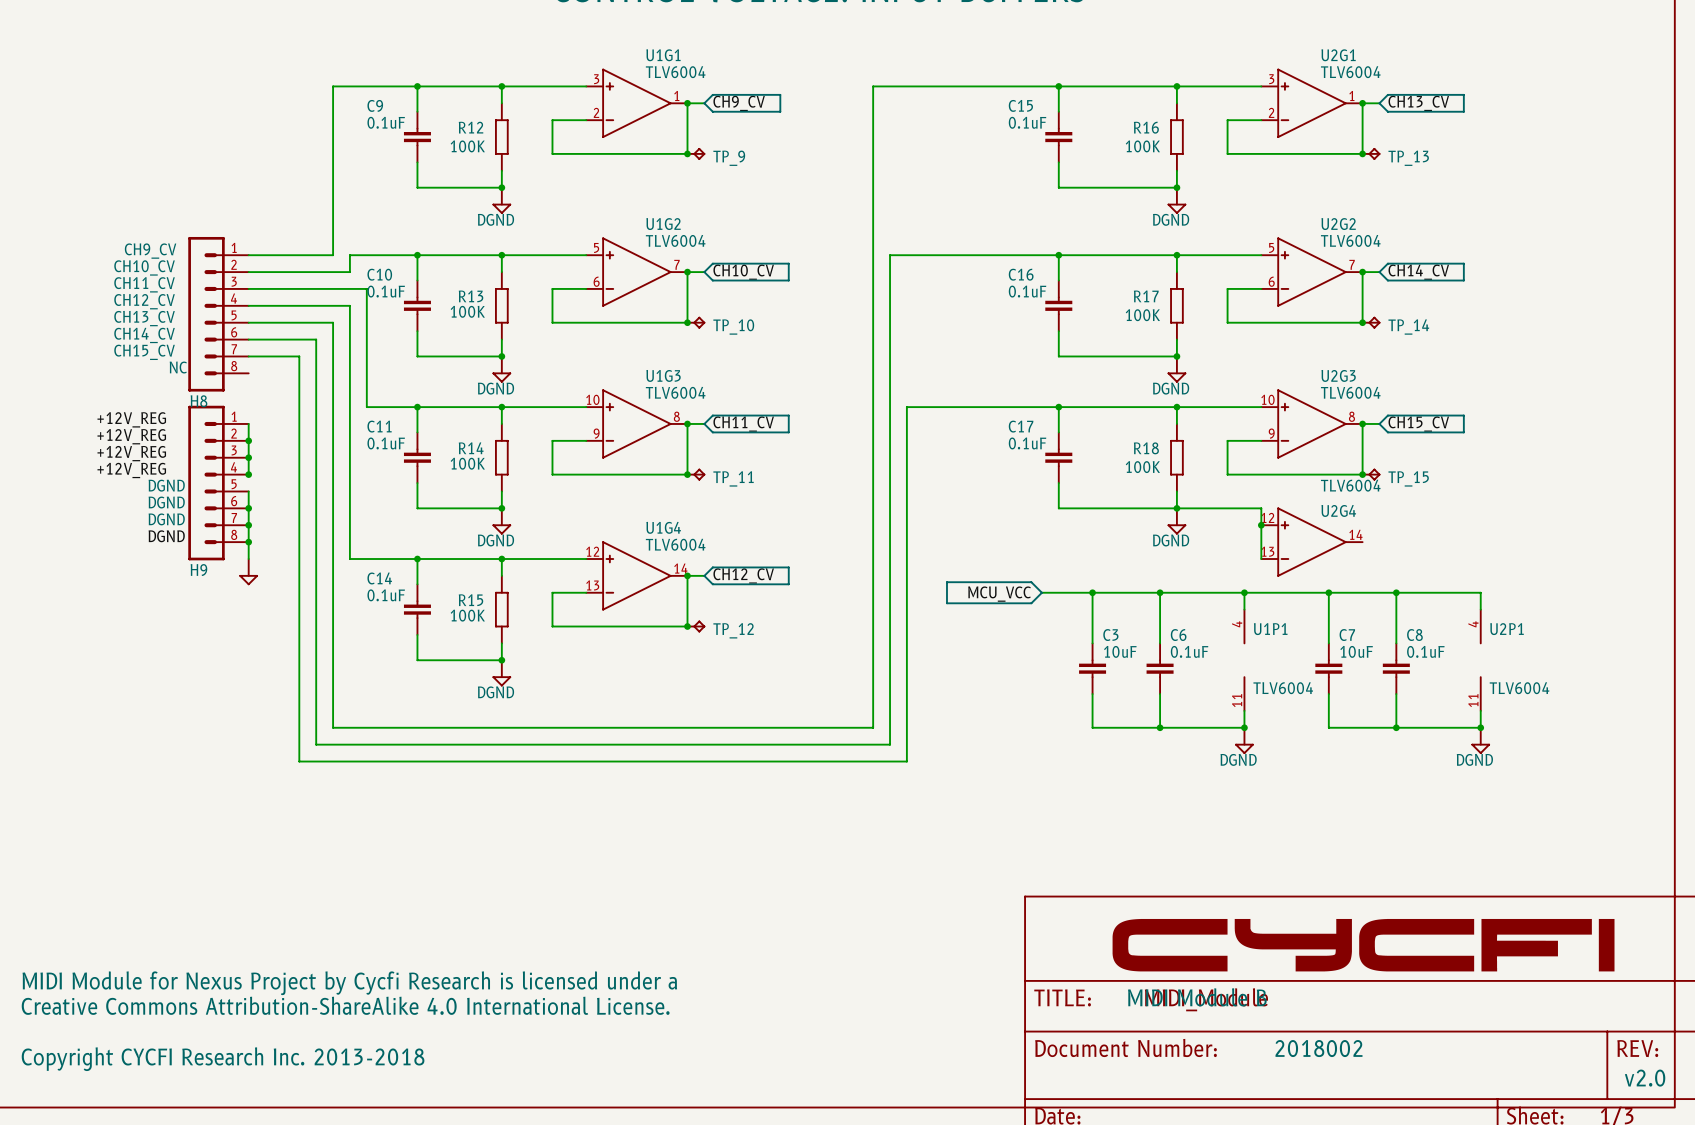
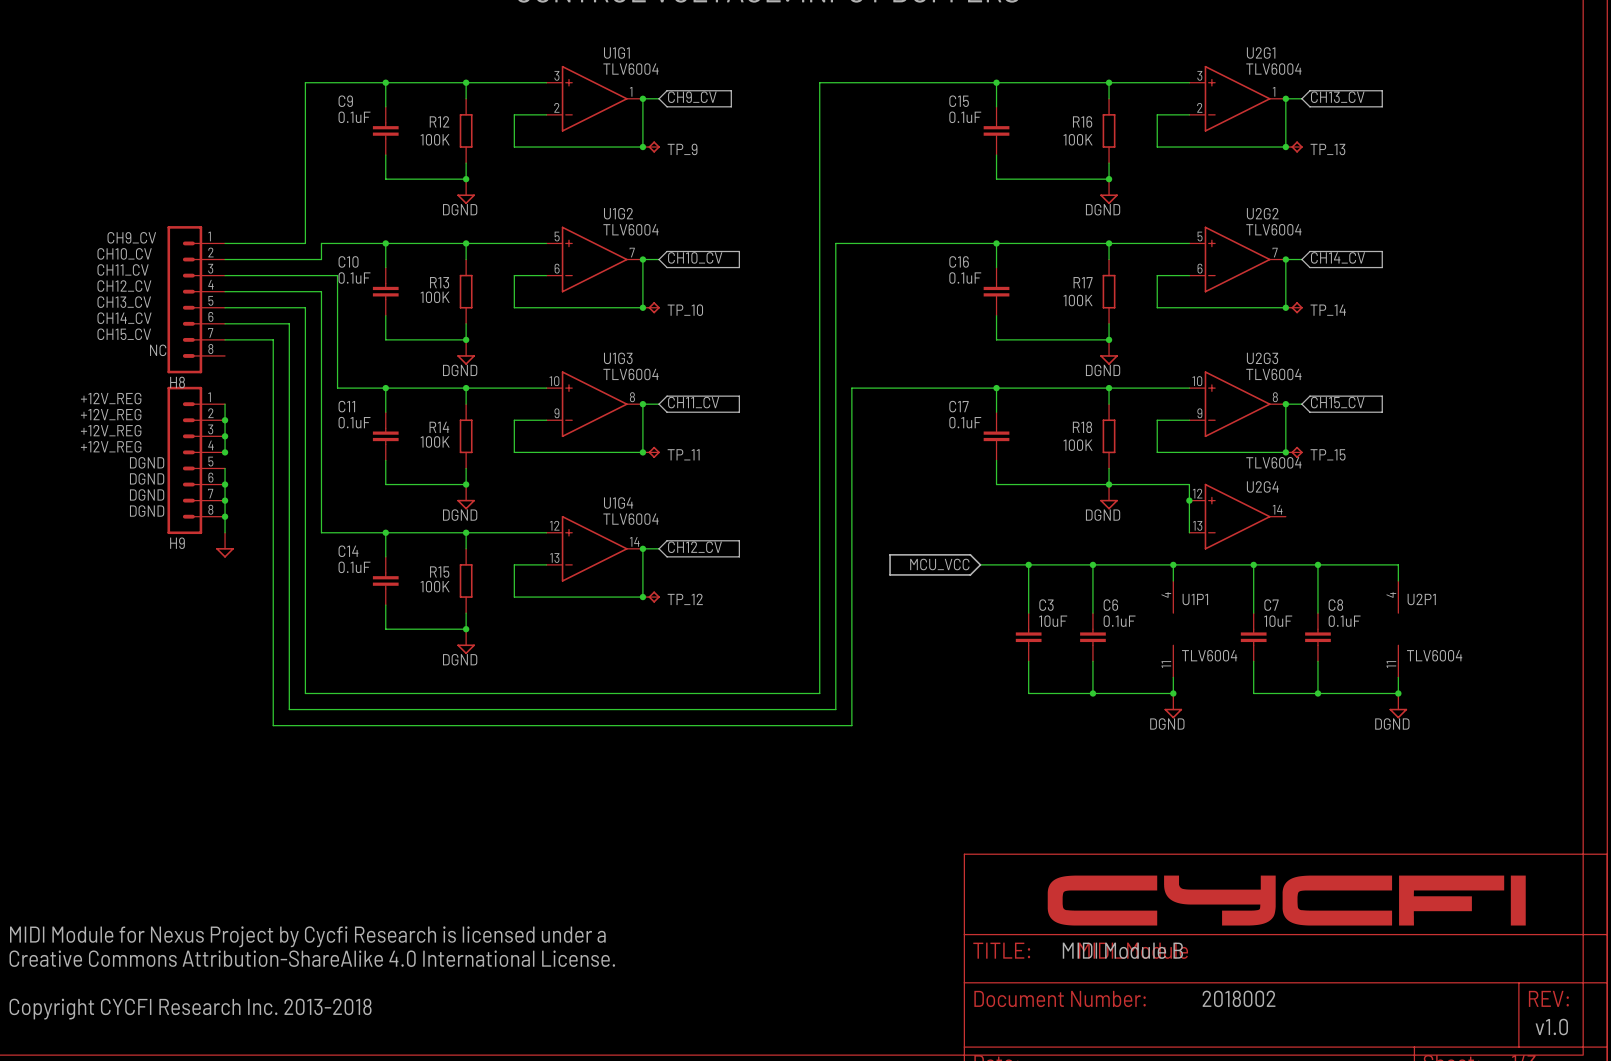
text: v2.0 (1645, 1078) -> v1.0 (1551, 1027)

